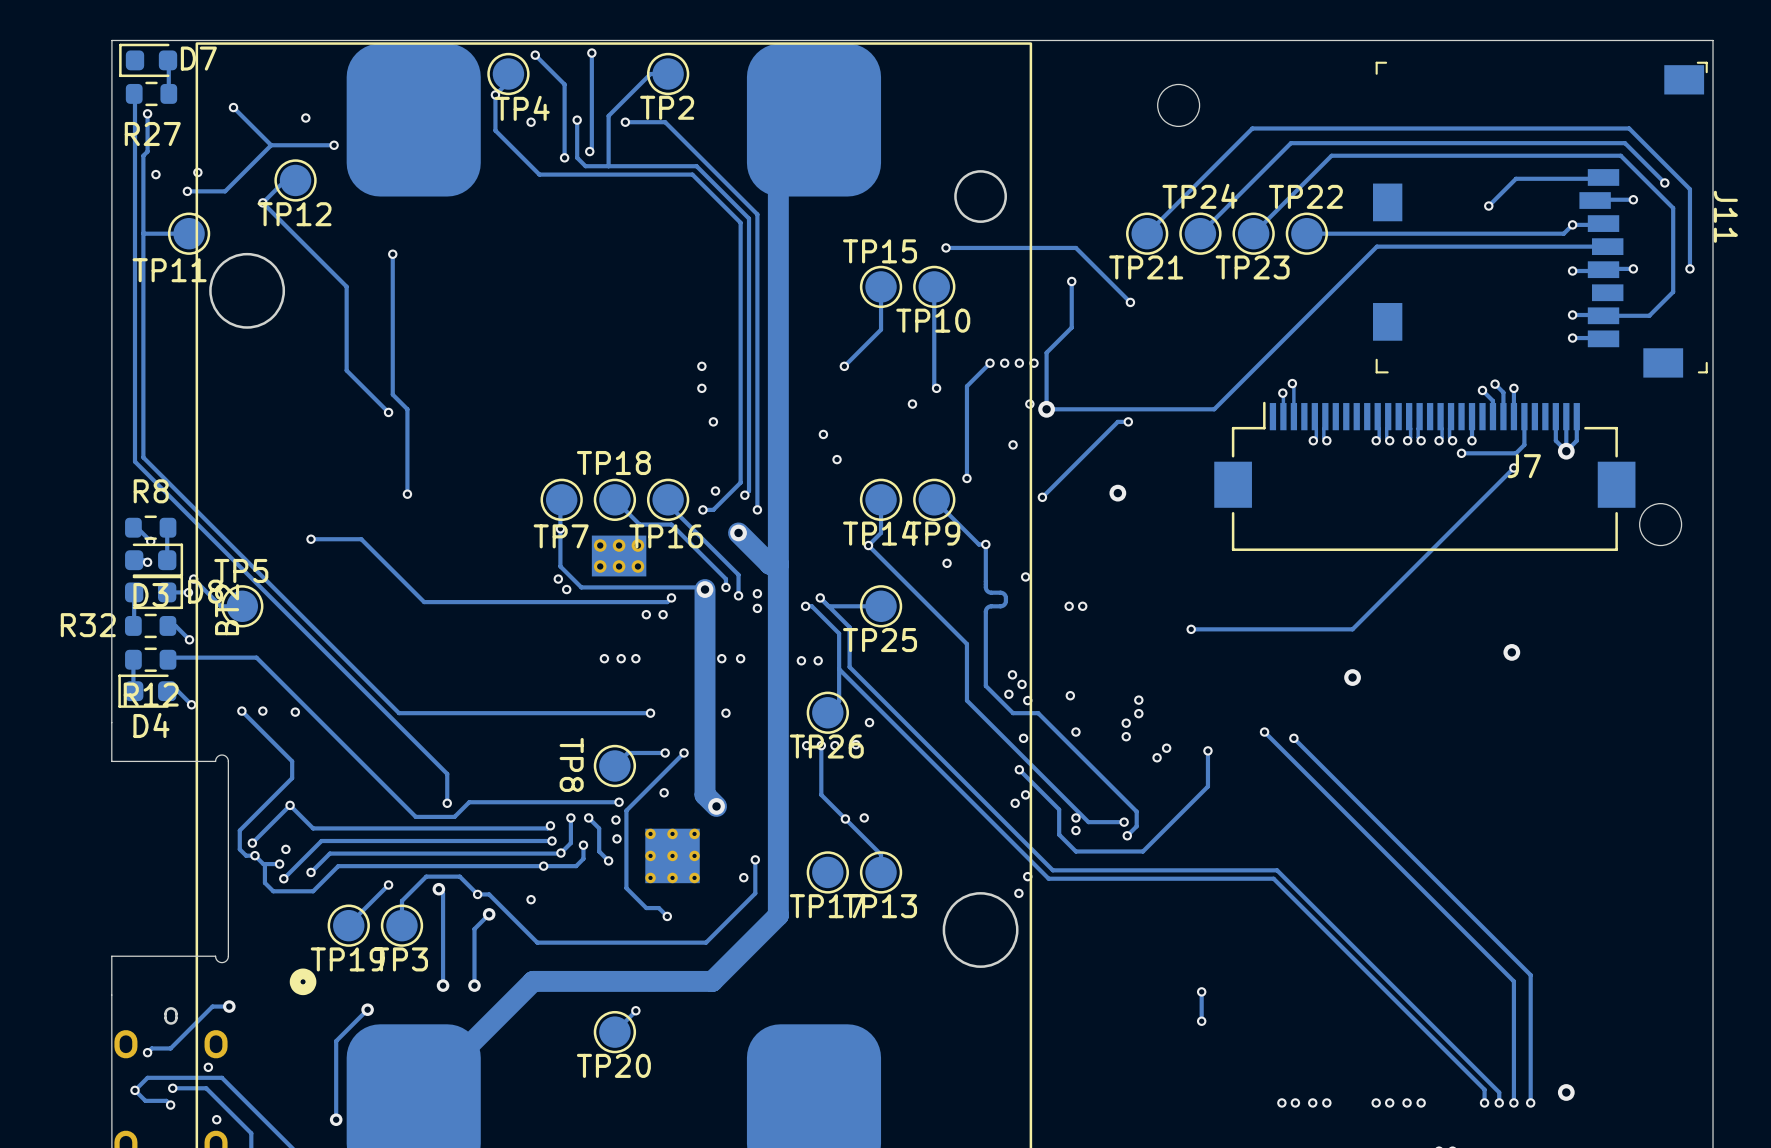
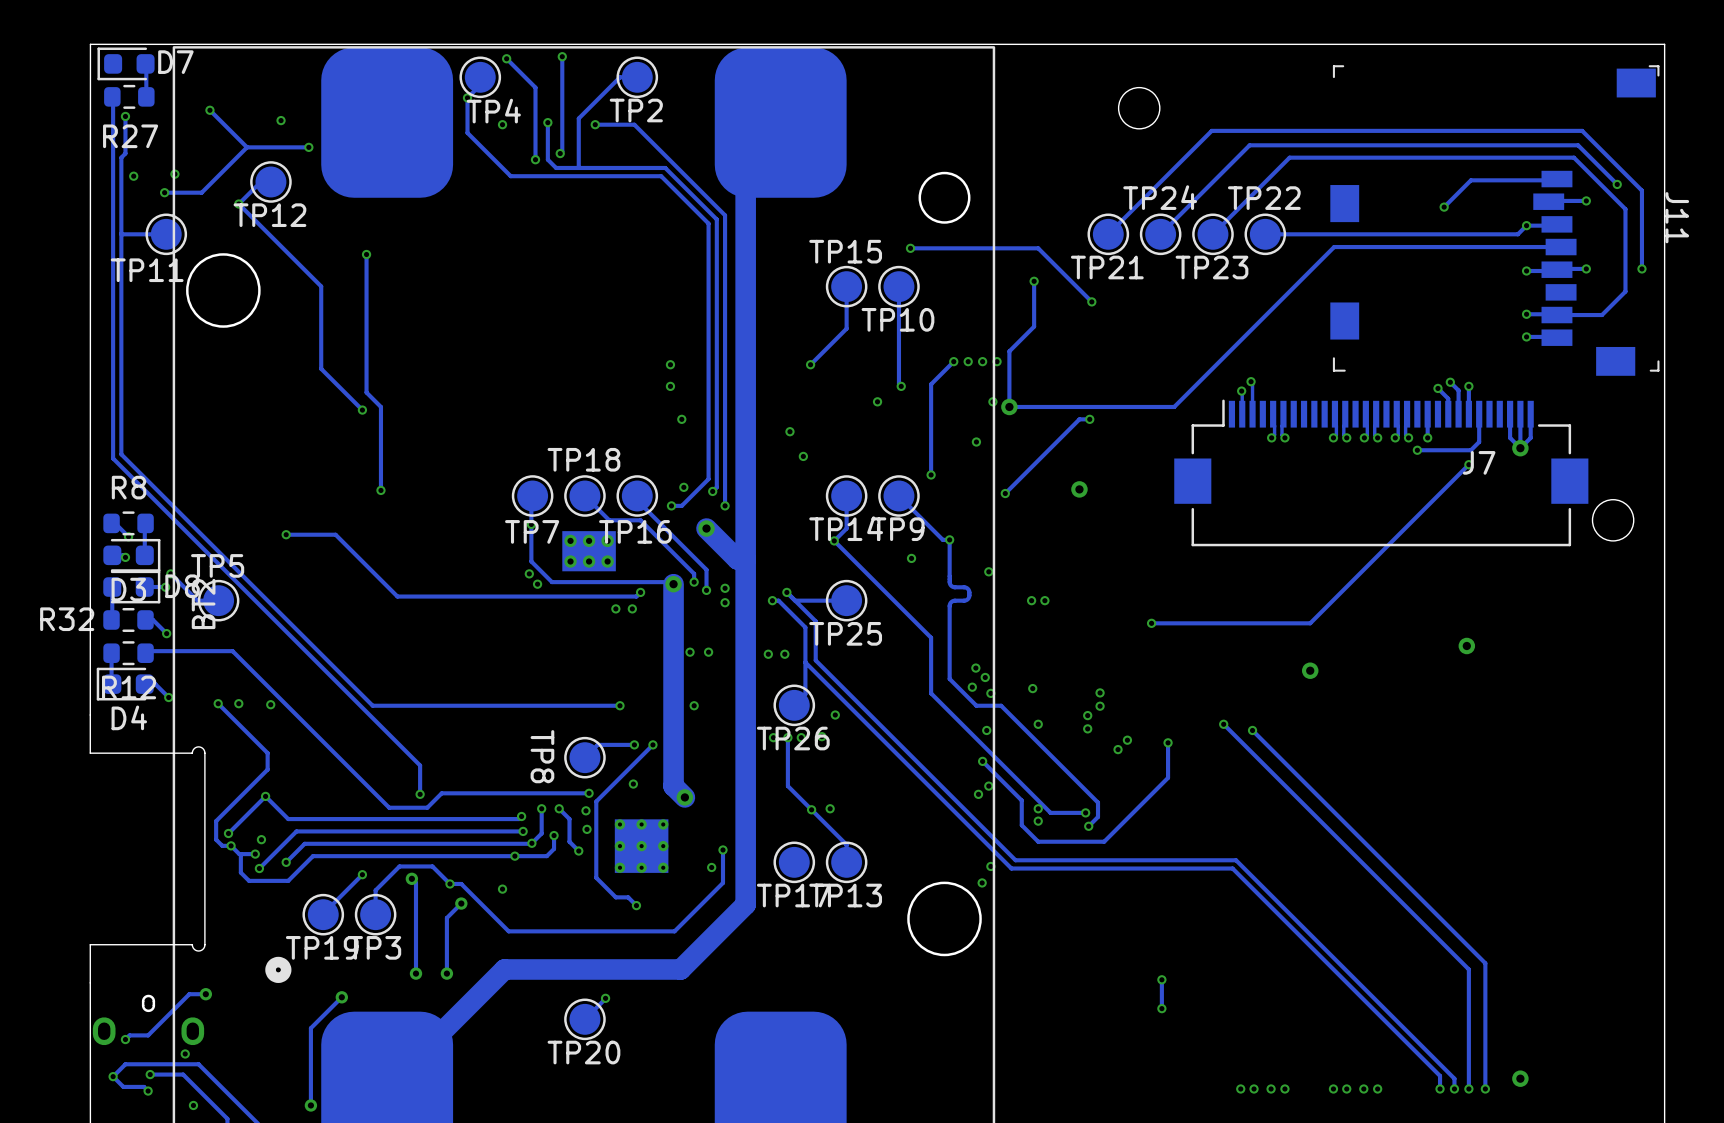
via: (604, 658) -> none
via: (621, 658) -> none
via: (635, 658) -> none

